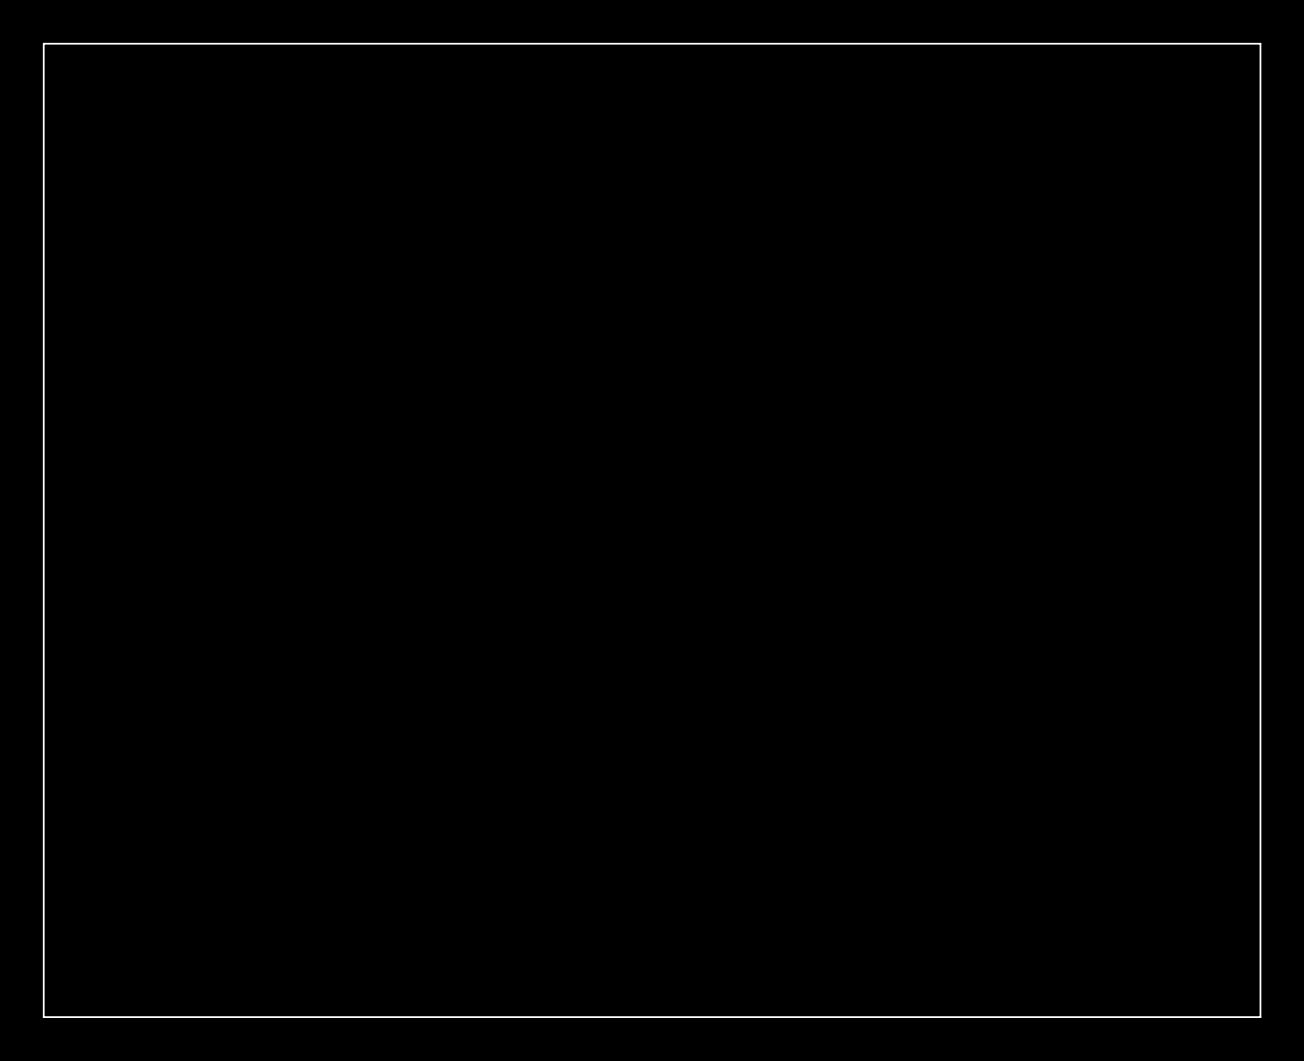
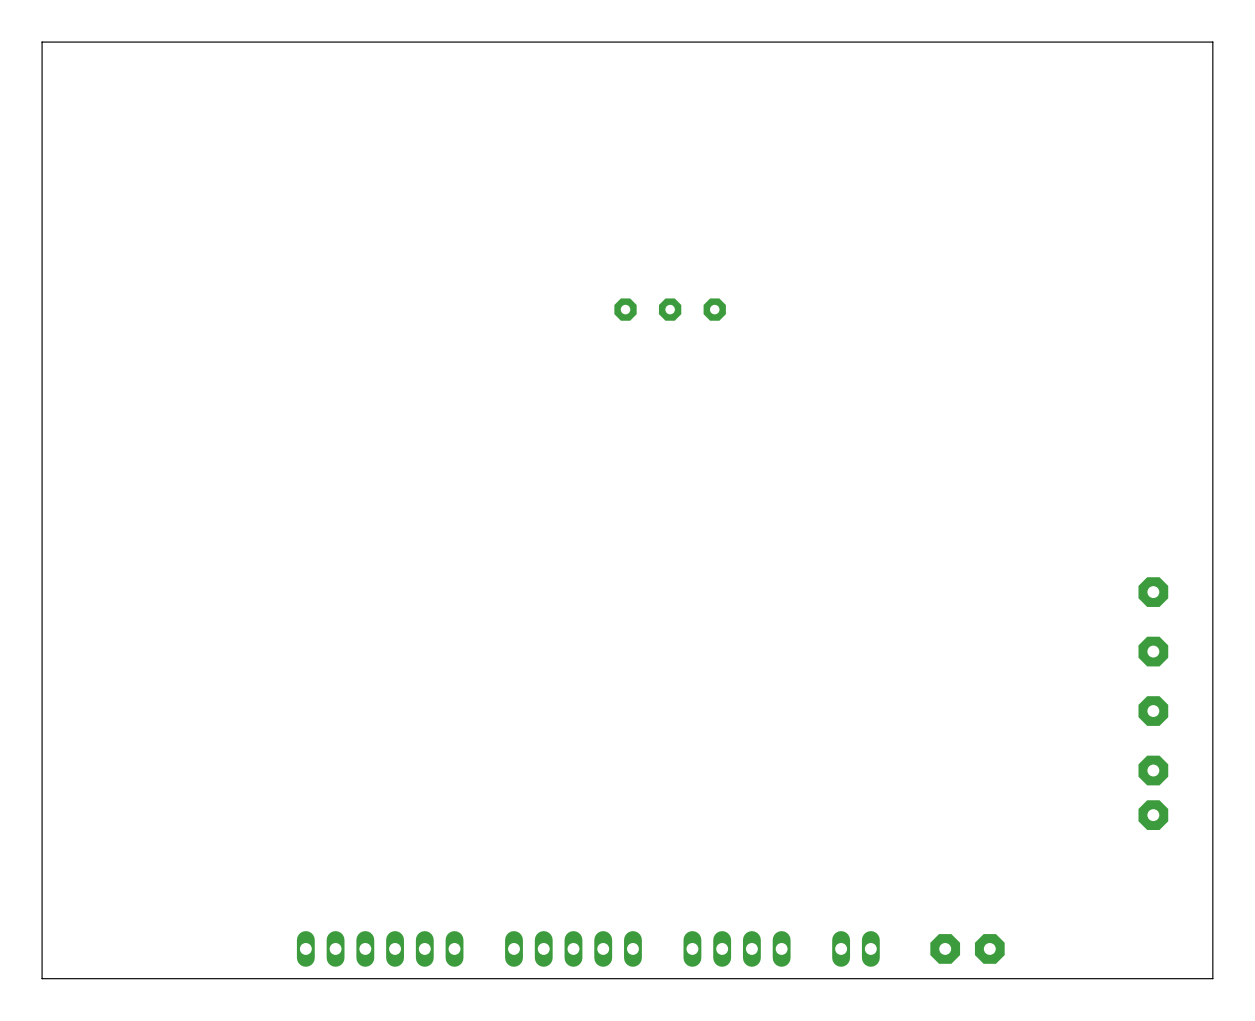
part: none -> (670, 309)
part: none -> (1153, 592)
part: none -> (1153, 651)
part: none -> (1153, 711)
part: none -> (1153, 770)
part: none -> (1153, 815)
part: none -> (380, 948)
part: none -> (573, 948)
part: none -> (737, 948)
part: none -> (855, 948)
part: none -> (945, 948)
part: none -> (989, 948)

